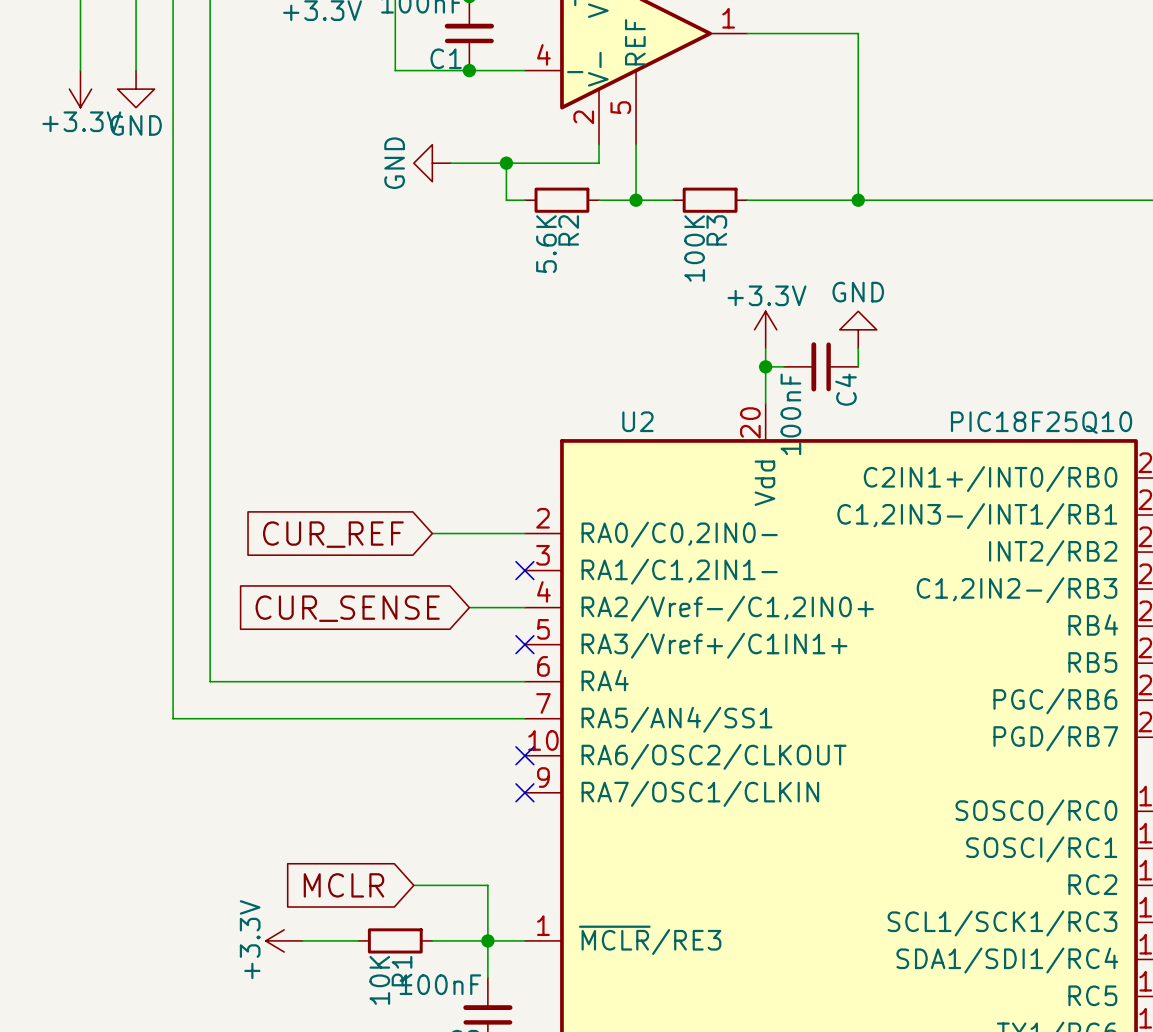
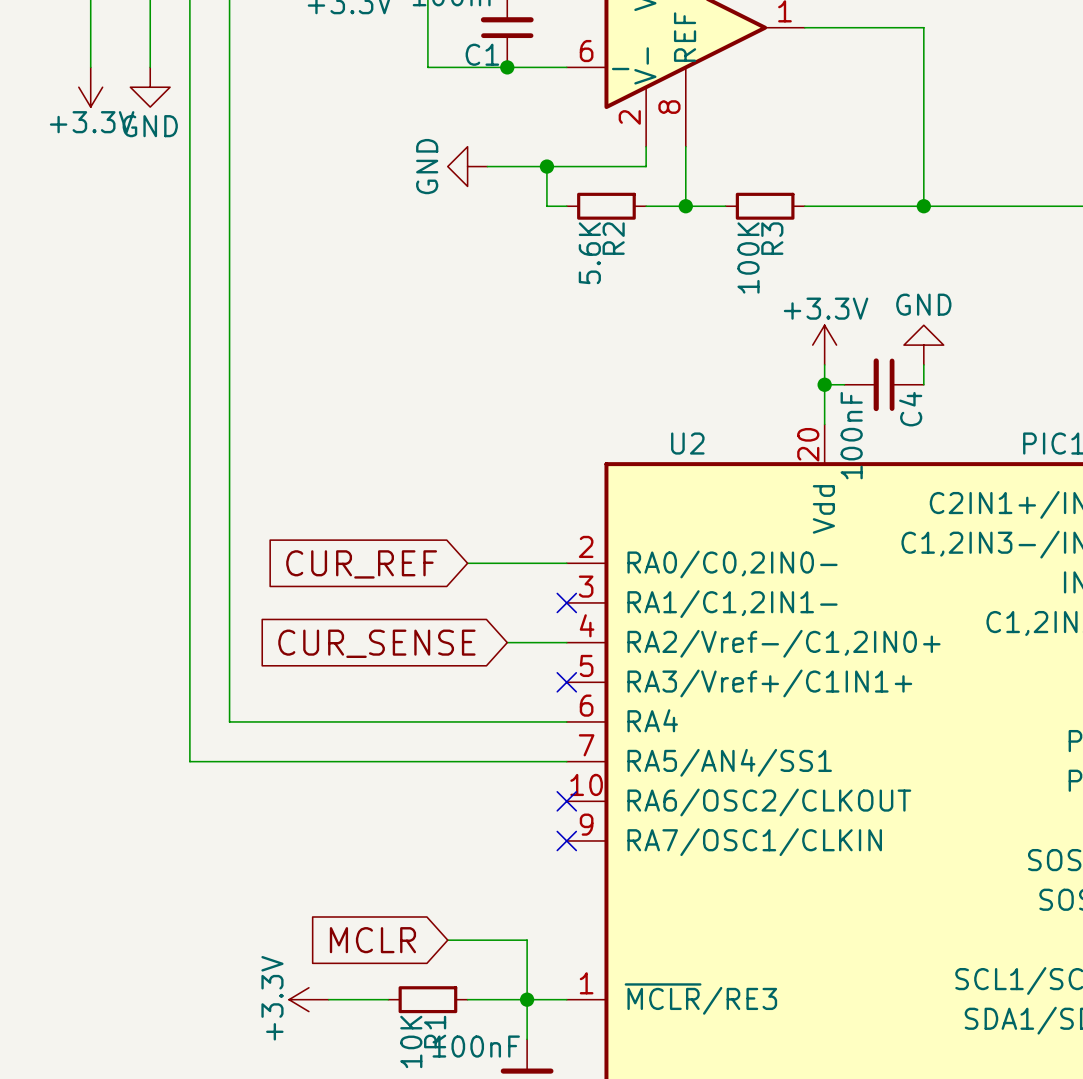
part pin number: 4 (543, 54) -> 6 (586, 51)
part pin number: 5 (620, 107) -> 8 (669, 107)

